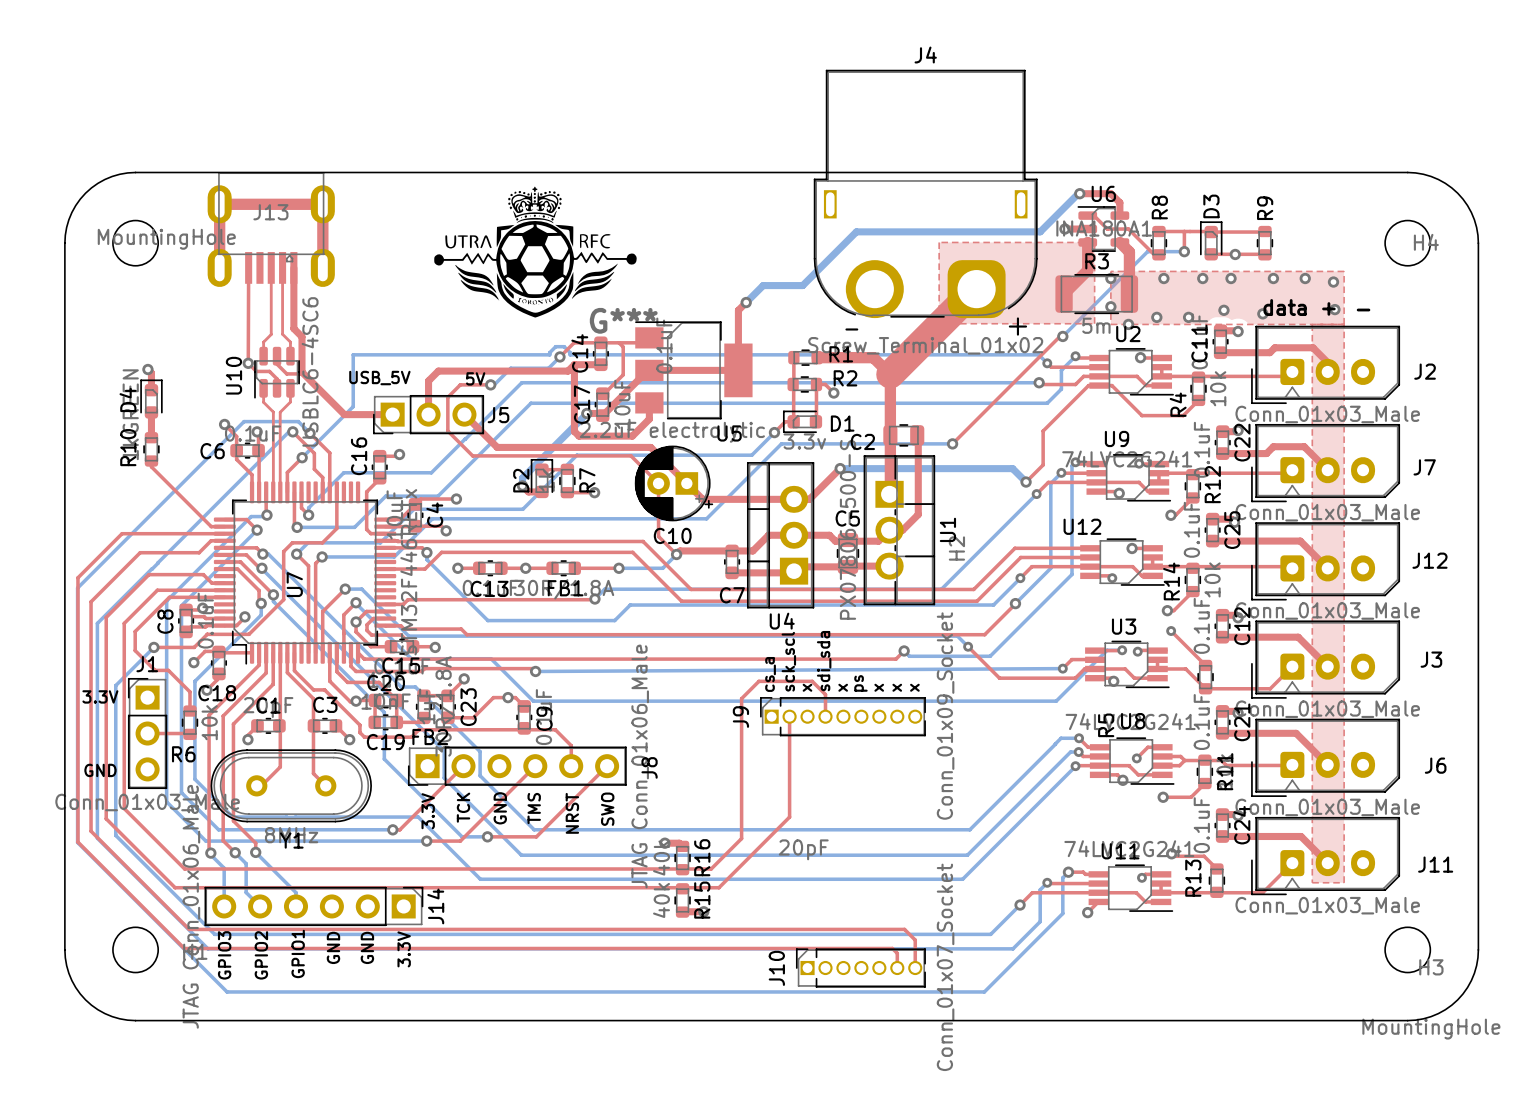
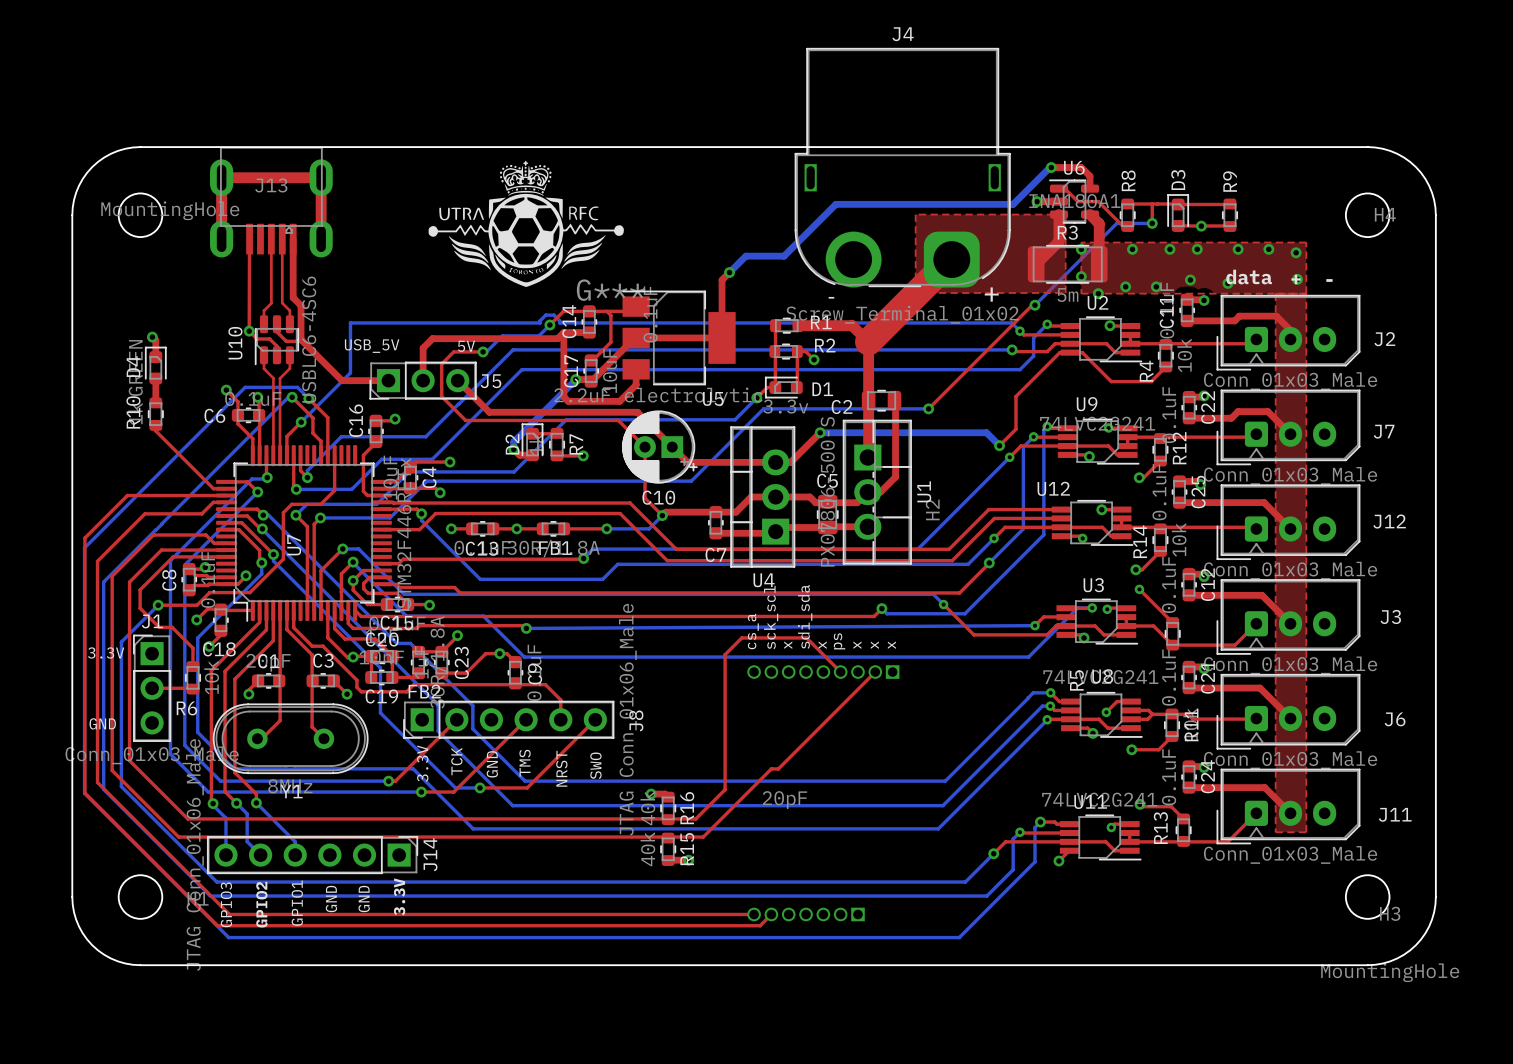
top track: (812, 681) (825, 694) (825, 716) -> (793, 637) (806, 637) (840, 672)
top track: (789, 716) (789, 817) -> (875, 672) (778, 768) (771, 768)
J9 side: top (842, 716) -> bottom (823, 672)
top track: (189, 929) (904, 929) (915, 940) (915, 968) -> (192, 877) (229, 914) (754, 914)
top track: (184, 948) (892, 948) (897, 953) (897, 968) -> (187, 895) (217, 925) (760, 925) (771, 914)
J10 side: top (860, 968) -> bottom (806, 914)

